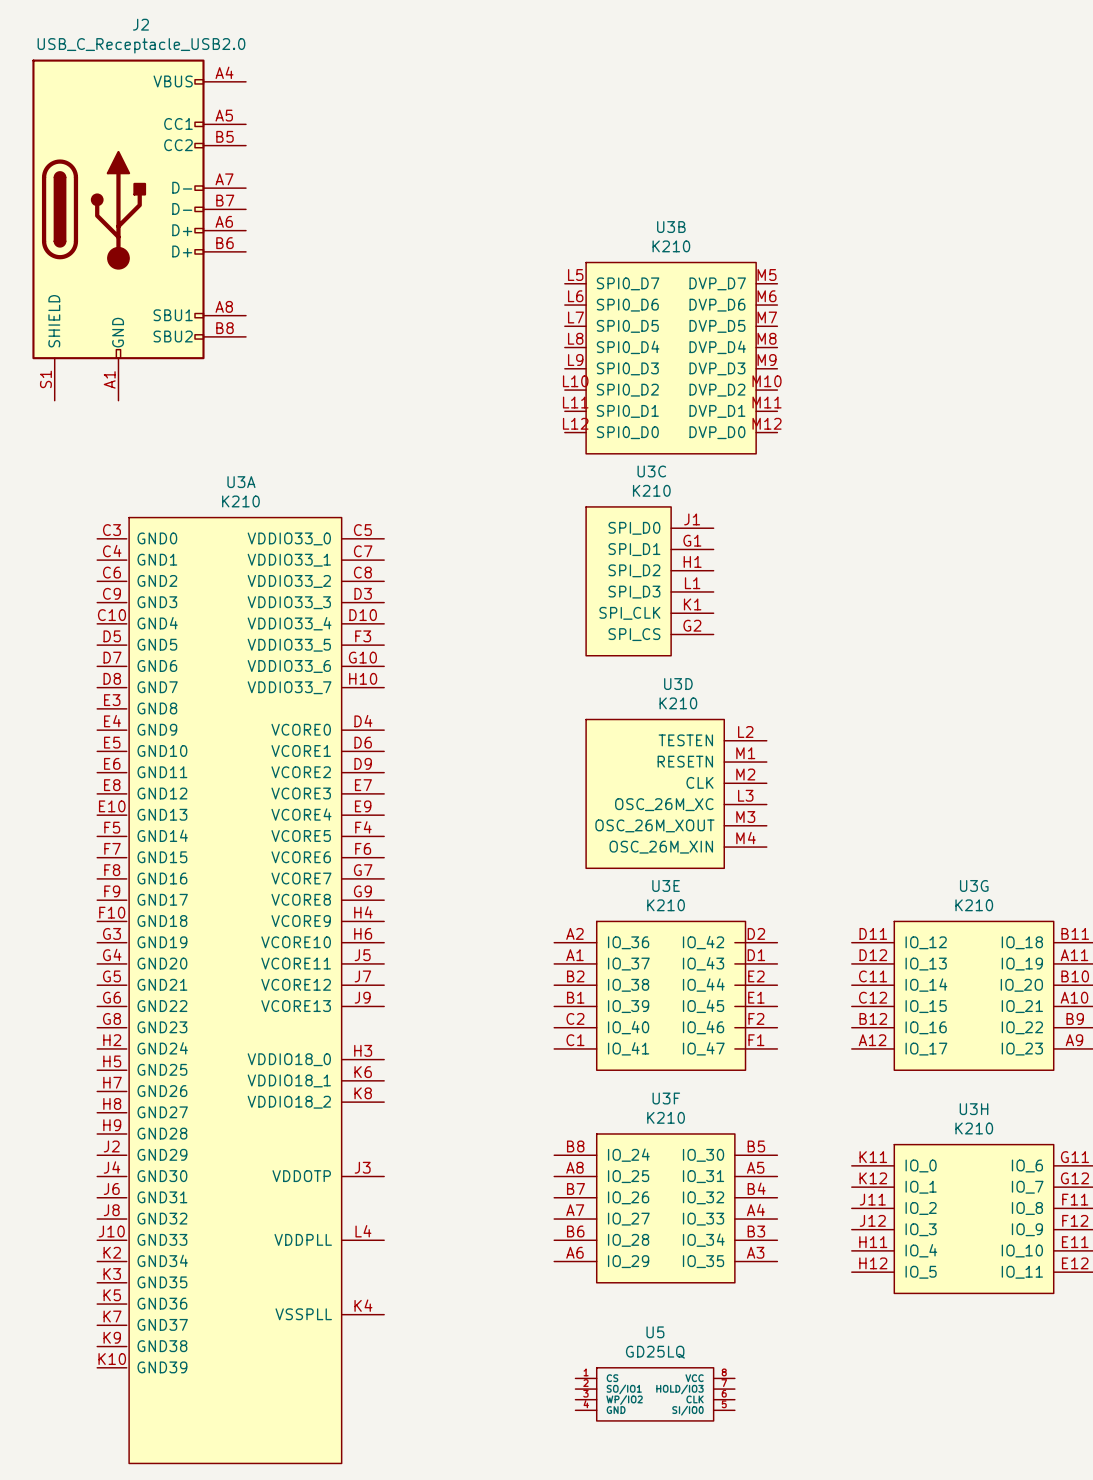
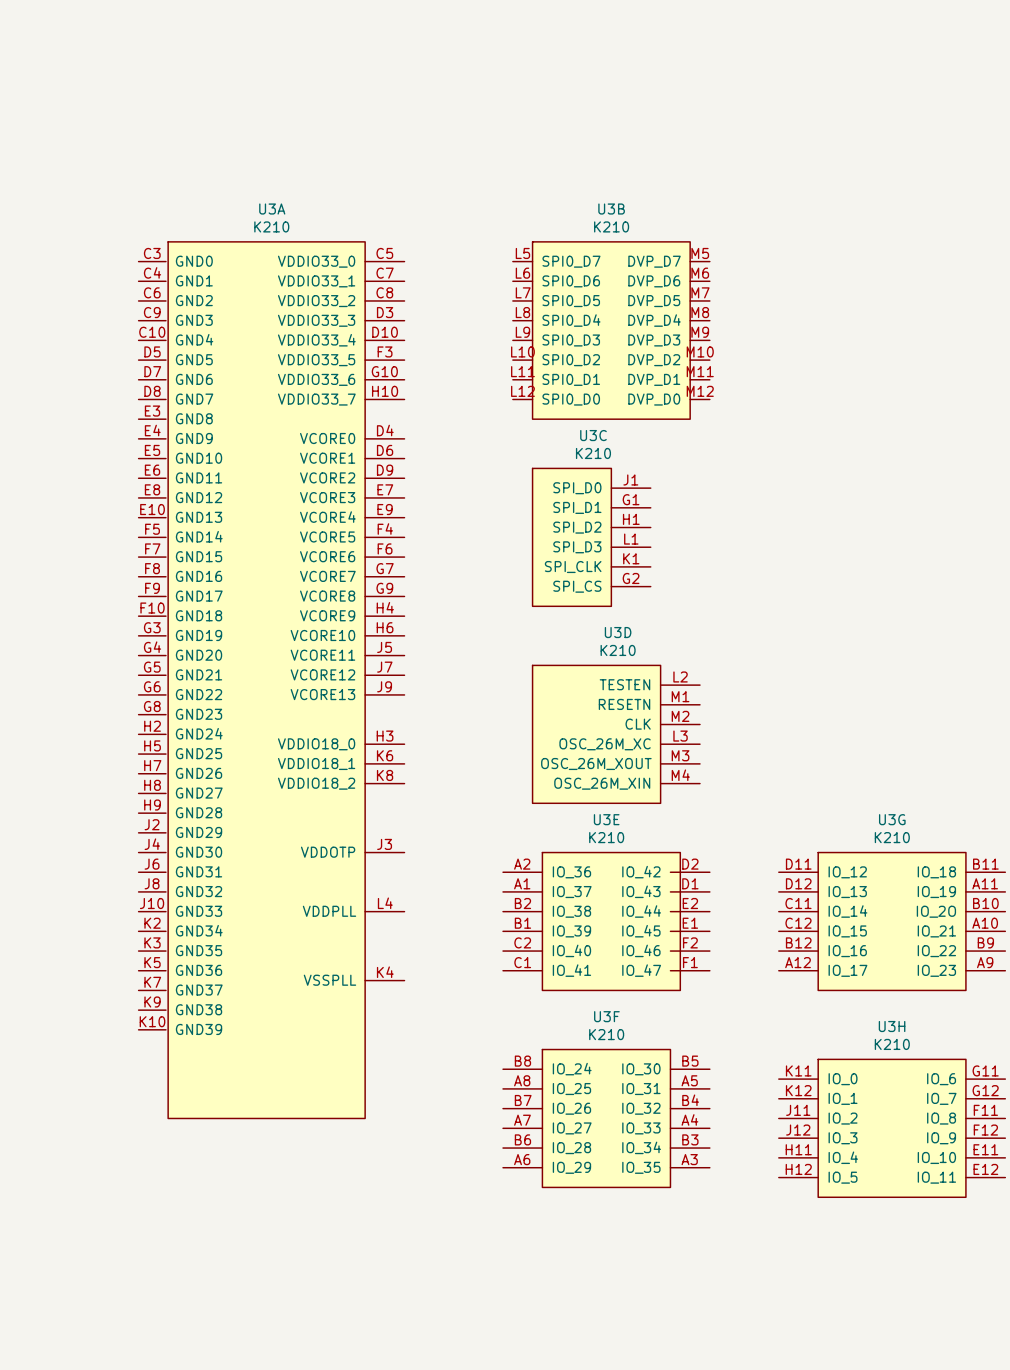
J2: USB_C_Receptacle_USB2.0 (139, 230) -> none
U3A position: (240, 990) -> (271, 680)
U5: GD25LQ (655, 1394) -> none

